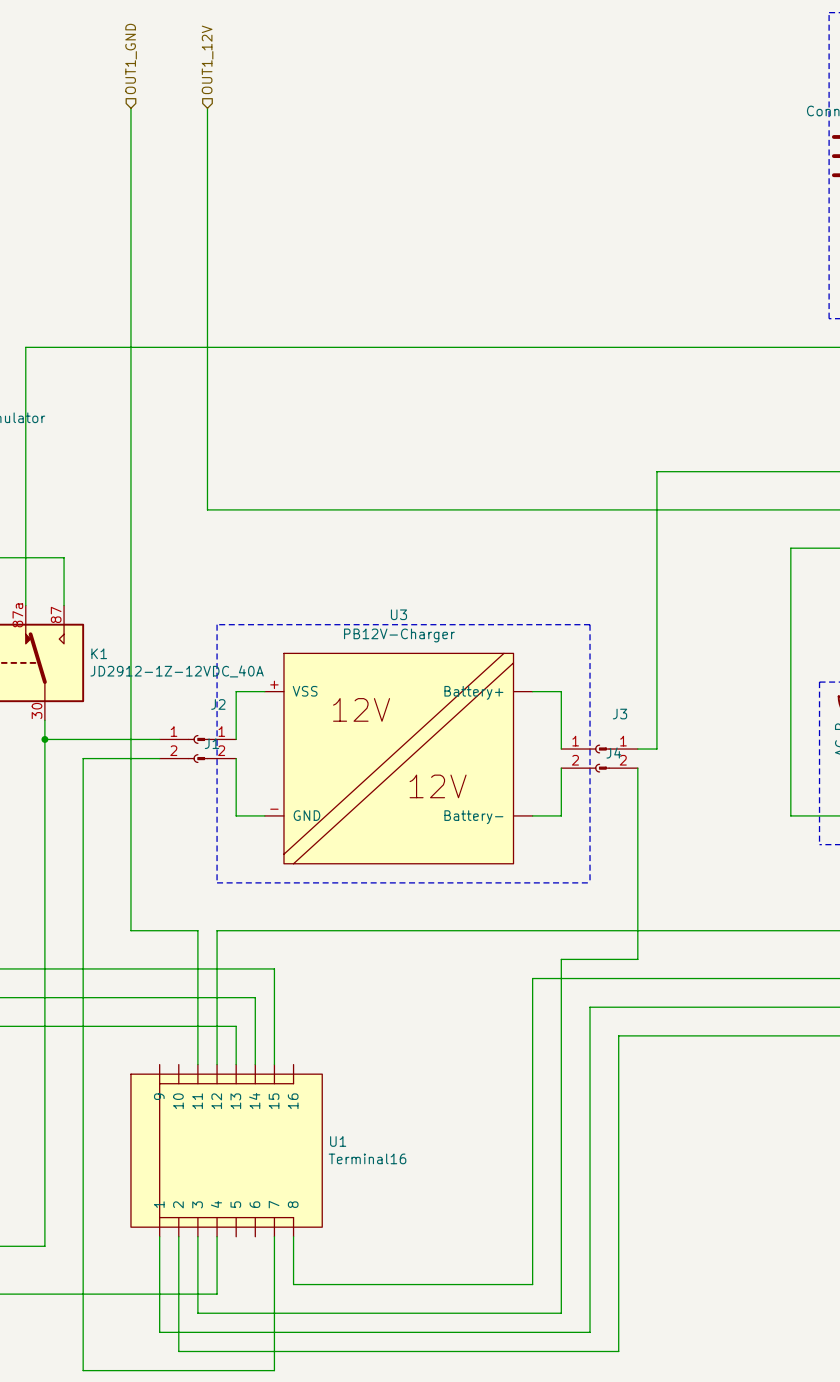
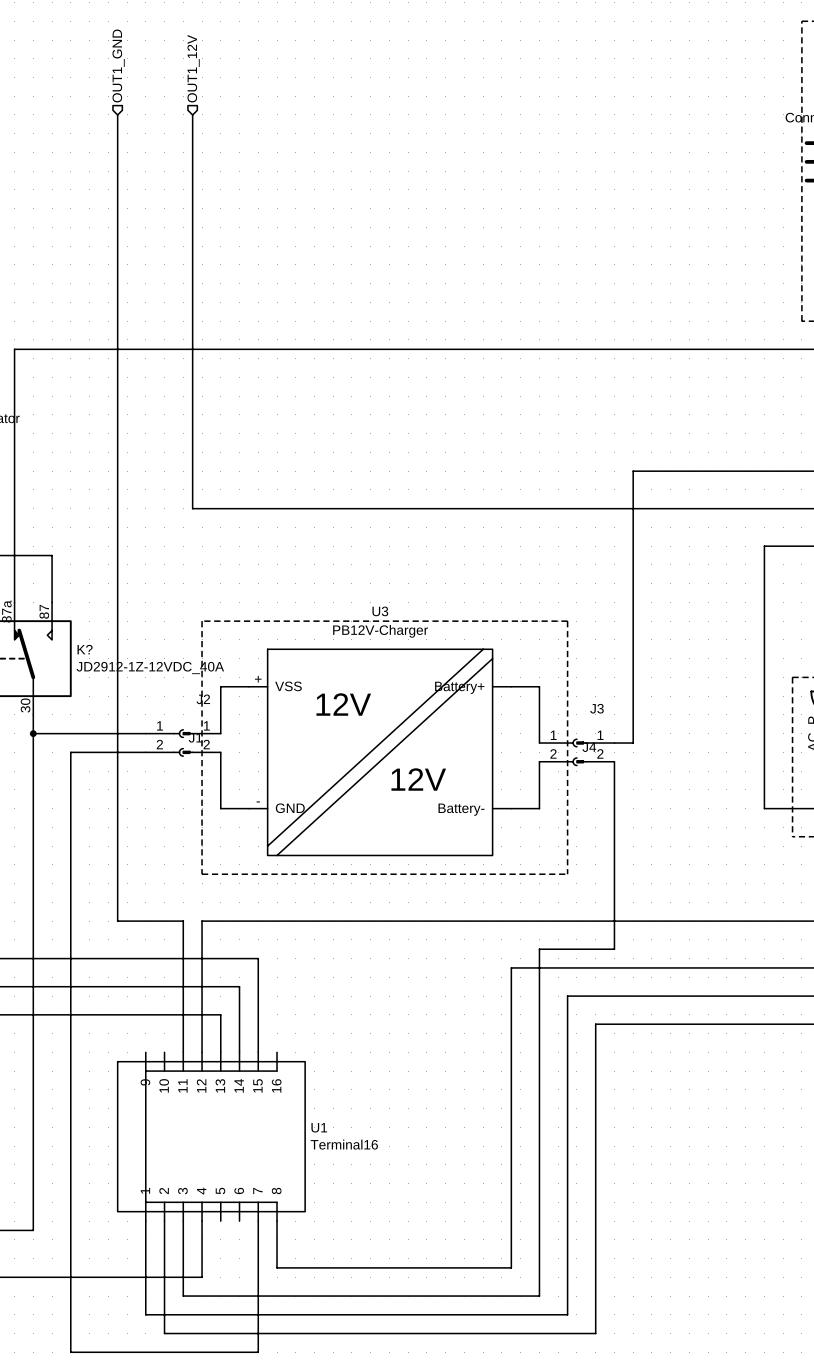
K1 name: K1 (99, 653) -> K? (85, 649)

